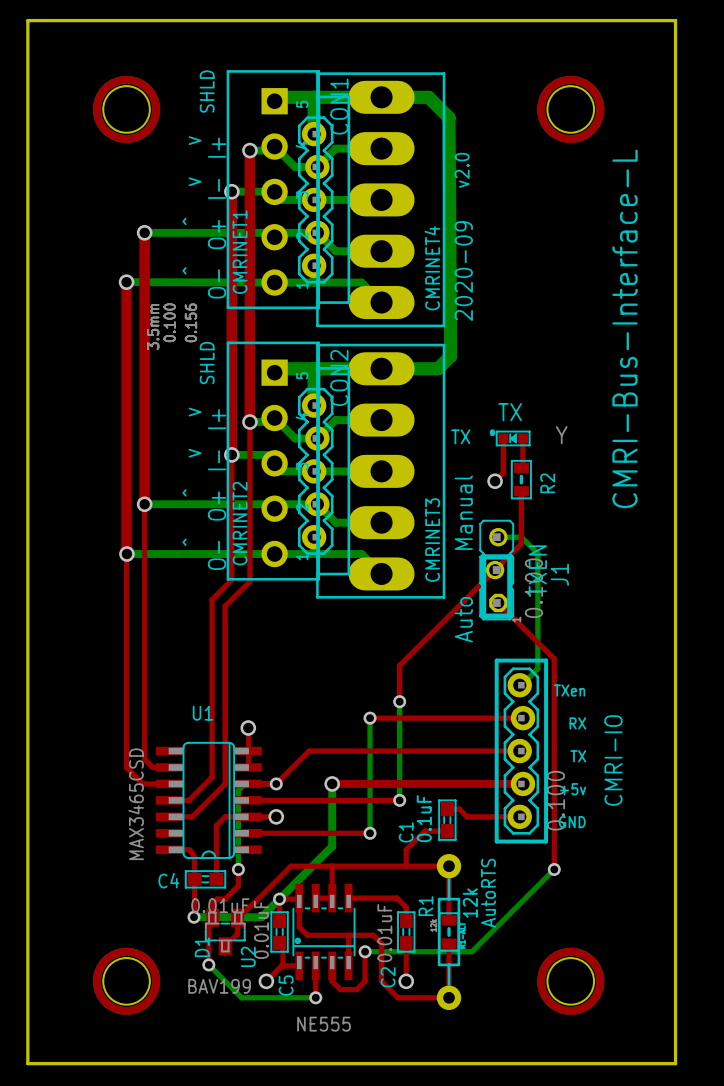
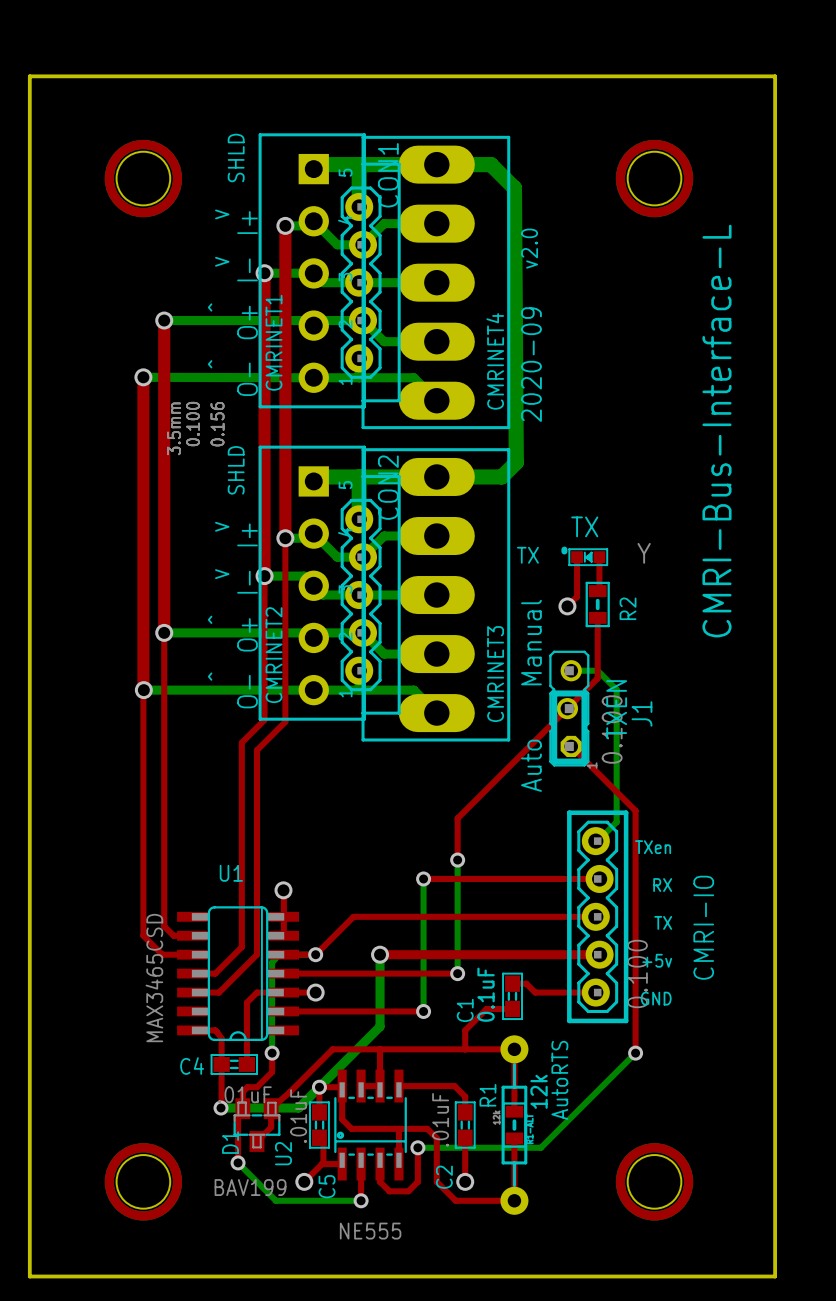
C4 value: 0.01uF (220, 905) -> .01uF (244, 1094)
C5 value: 0.01uF (261, 929) -> .01uF (298, 1116)
C2 value: 0.01uF (384, 933) -> .01uF (440, 1119)

